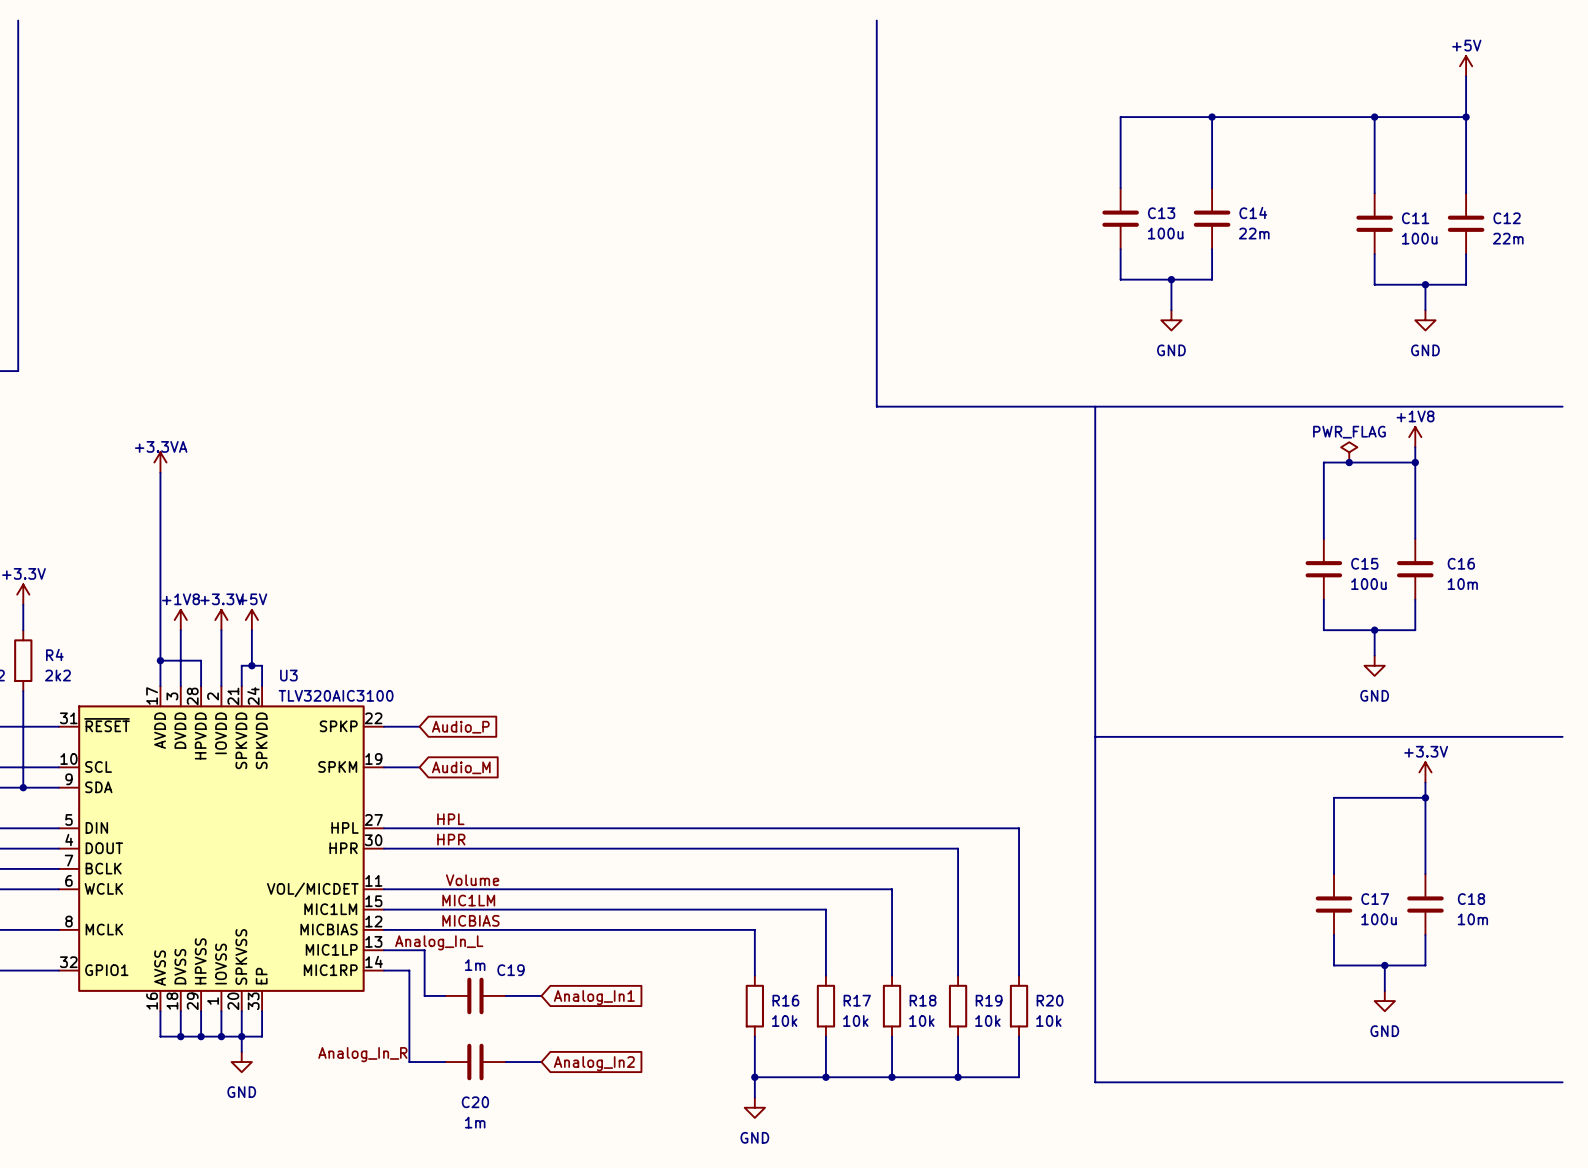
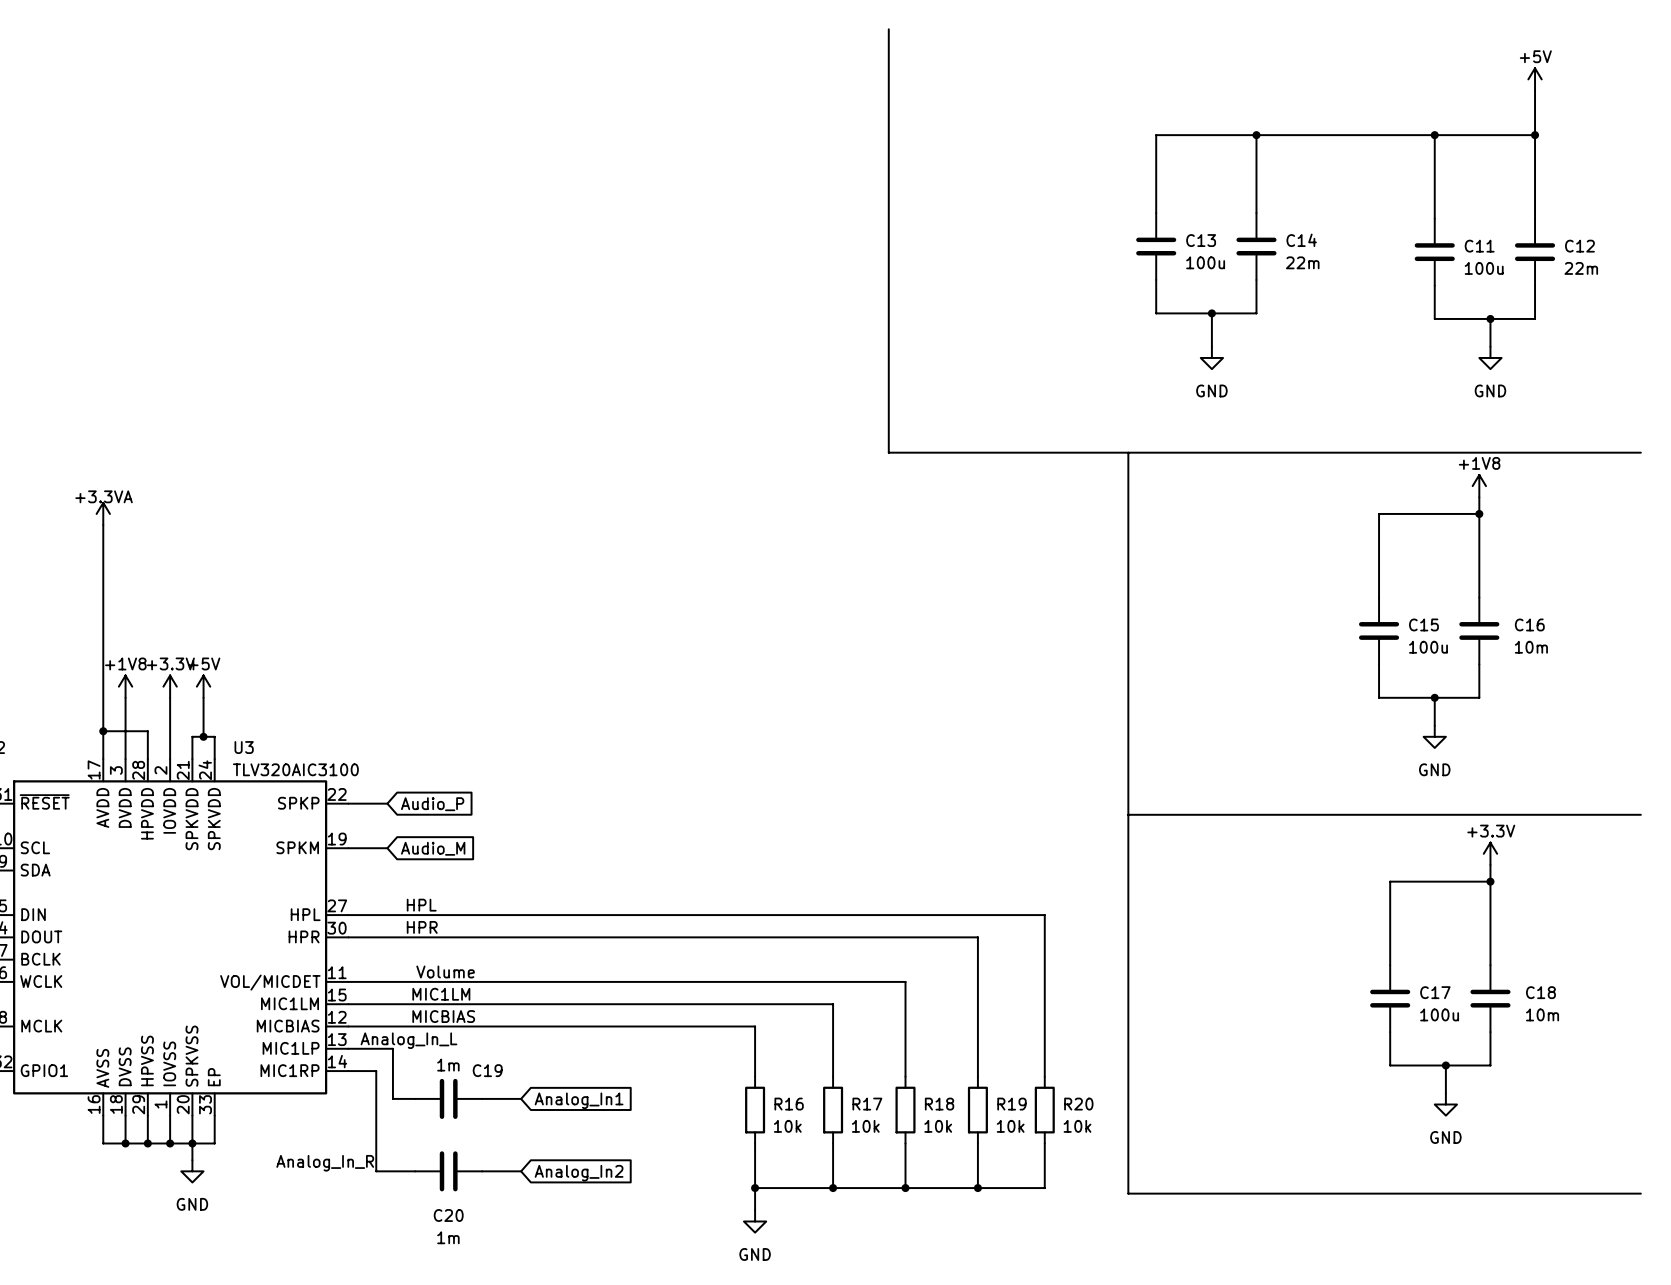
power symbol: PWR_FLAG (1349, 452) -> none
junction: (1349, 462) -> none

